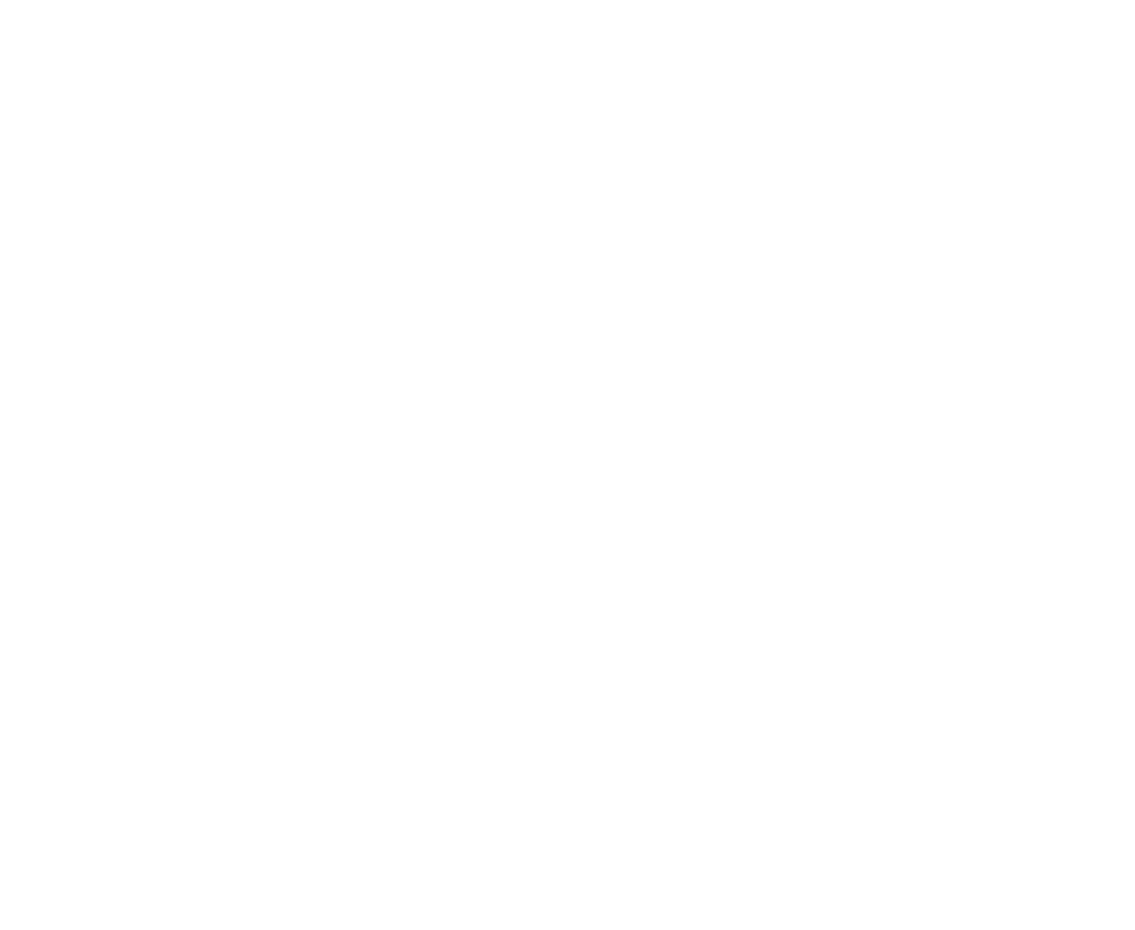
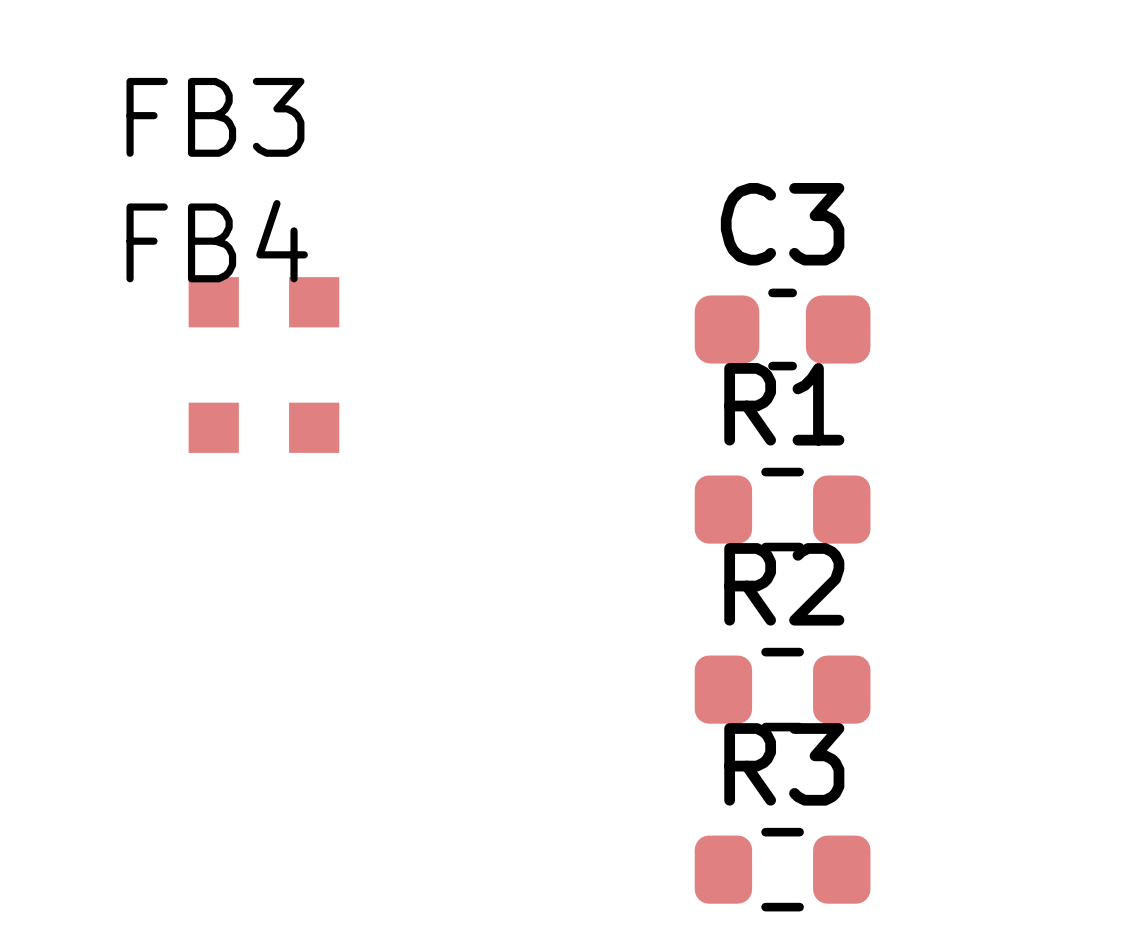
FB3: none -> (263, 302)
C3: none -> (782, 329)
FB4: none -> (263, 427)
R1: none -> (782, 509)
R2: none -> (782, 689)
R3: none -> (782, 869)

